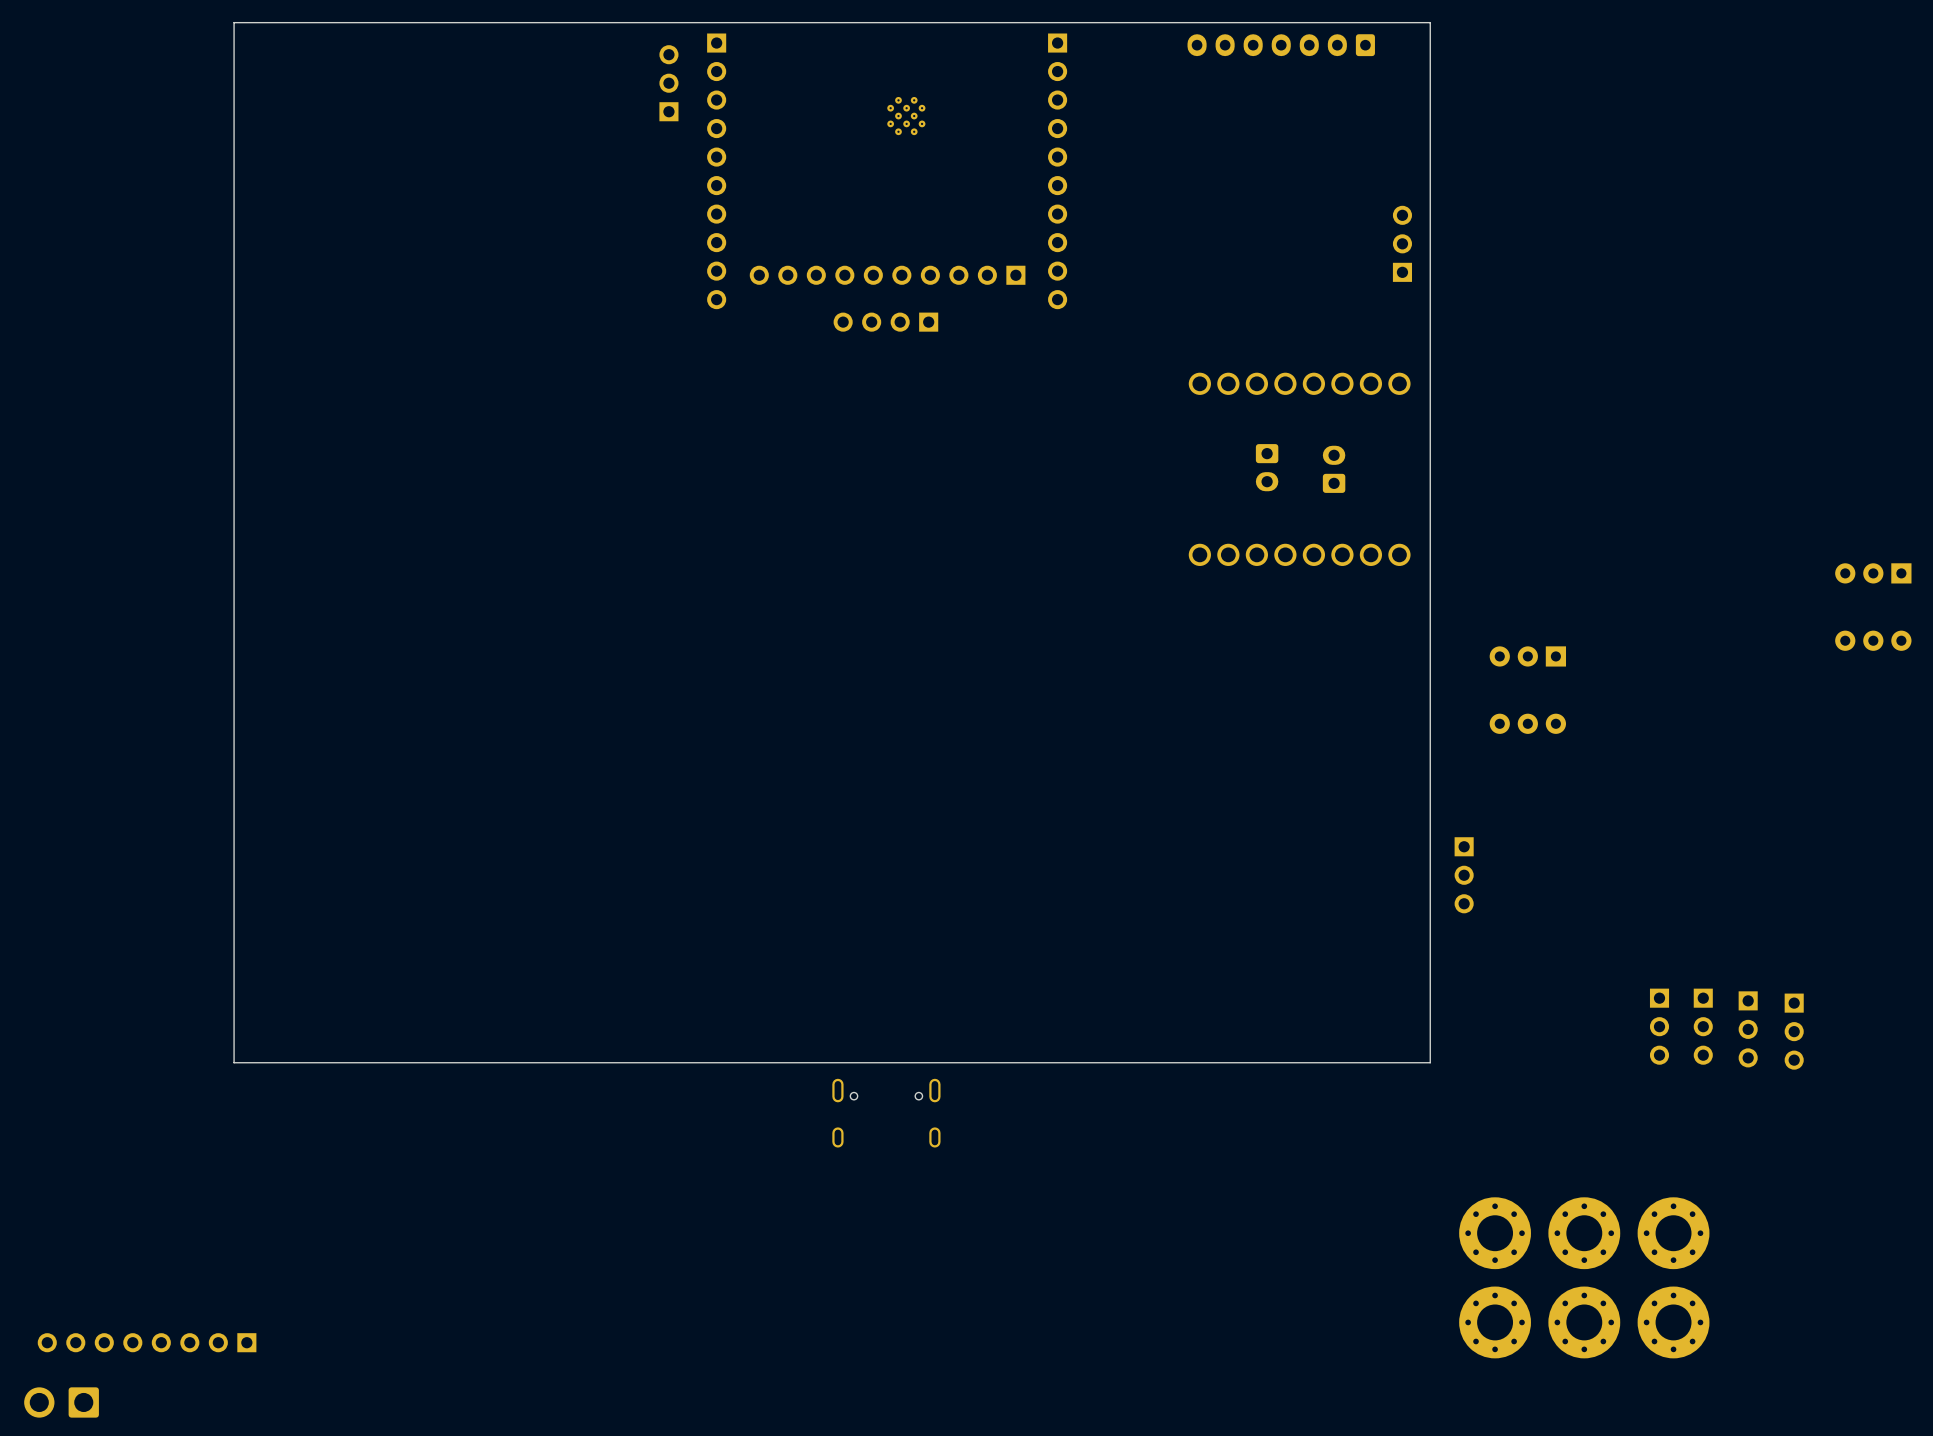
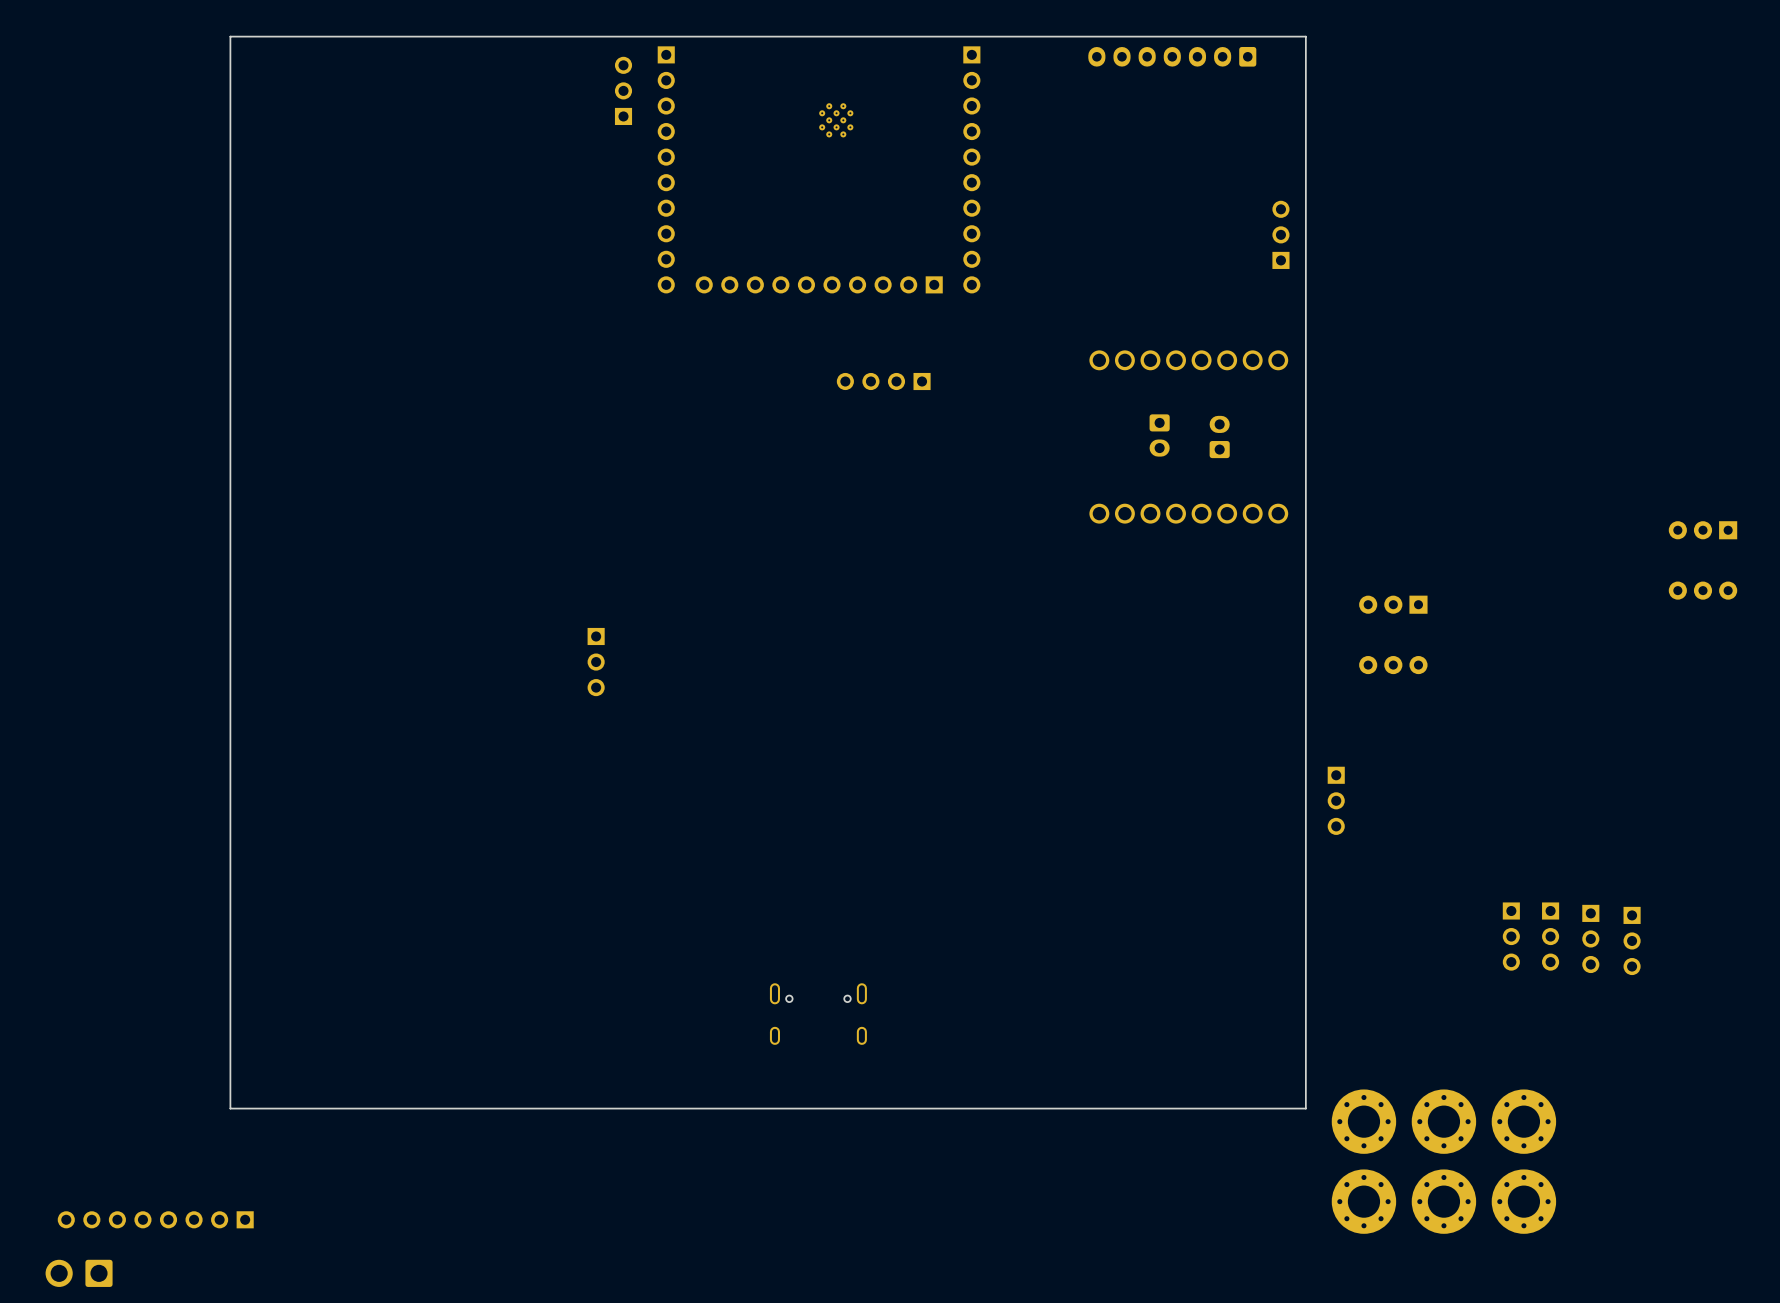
board edge: (234, 22) (234, 1062) (1430, 1062) -> (233, 36) (230, 36) (230, 1108) (1305, 1108) (1305, 968)
part position: (887, 275) -> (819, 284)
part position: (885, 322) -> (883, 381)
part: none -> (596, 662)

